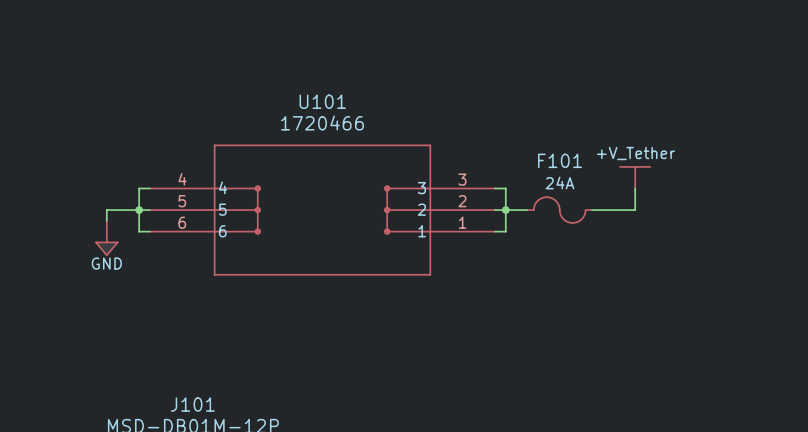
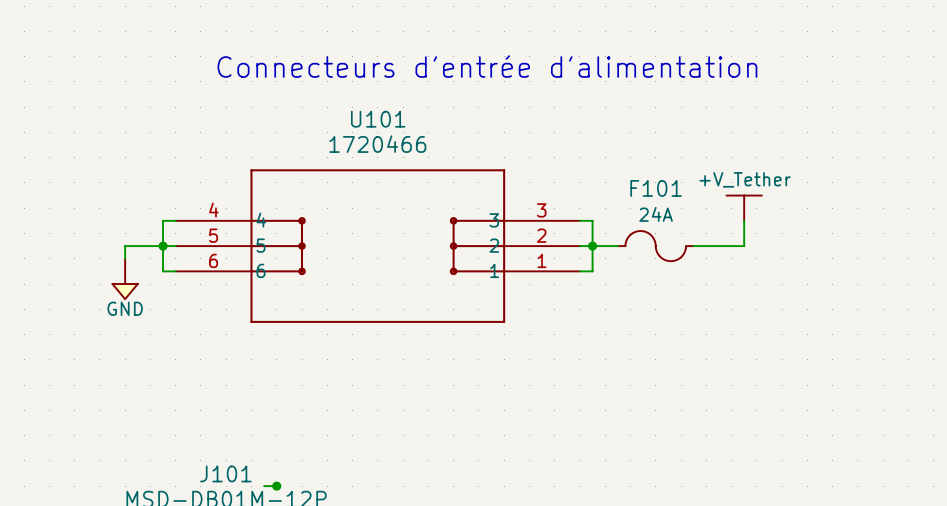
text: none -> Connecteurs d'entrée d'alimentation (487, 66)
wire: none -> (264, 486) (276, 486)
junction: none -> (276, 486)

